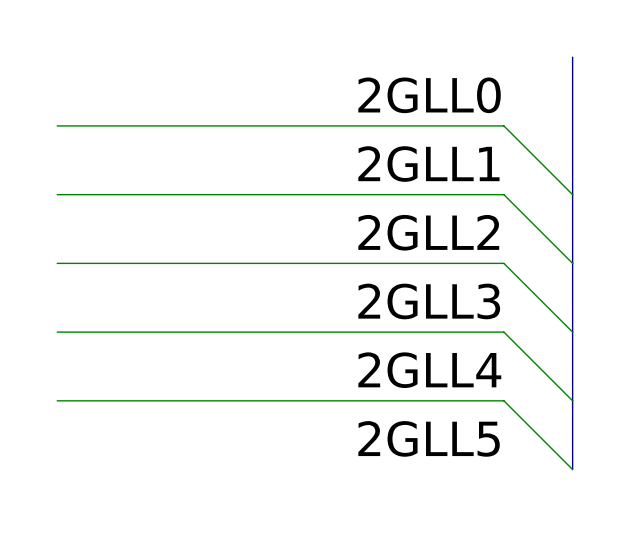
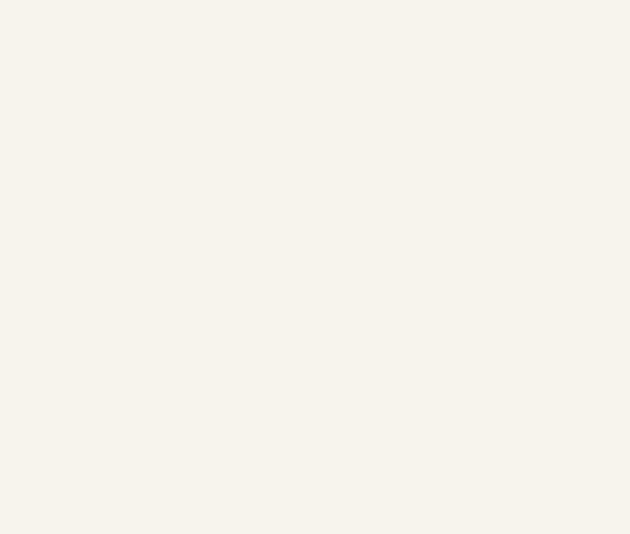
bus: (572, 57) (572, 469) -> none
label: 2GLL0 (429, 95) -> none
wire: (57, 125) (503, 125) (572, 194) -> none
label: 2GLL1 (428, 164) -> none
wire: (57, 194) (503, 194) (572, 263) -> none
label: 2GLL2 (428, 232) -> none
wire: (57, 263) (503, 263) (572, 332) -> none
label: 2GLL3 (429, 301) -> none
wire: (57, 332) (503, 332) (572, 400) -> none
label: 2GLL4 (429, 370) -> none
wire: (57, 400) (503, 400) (572, 469) -> none
label: 2GLL5 (429, 438) -> none

